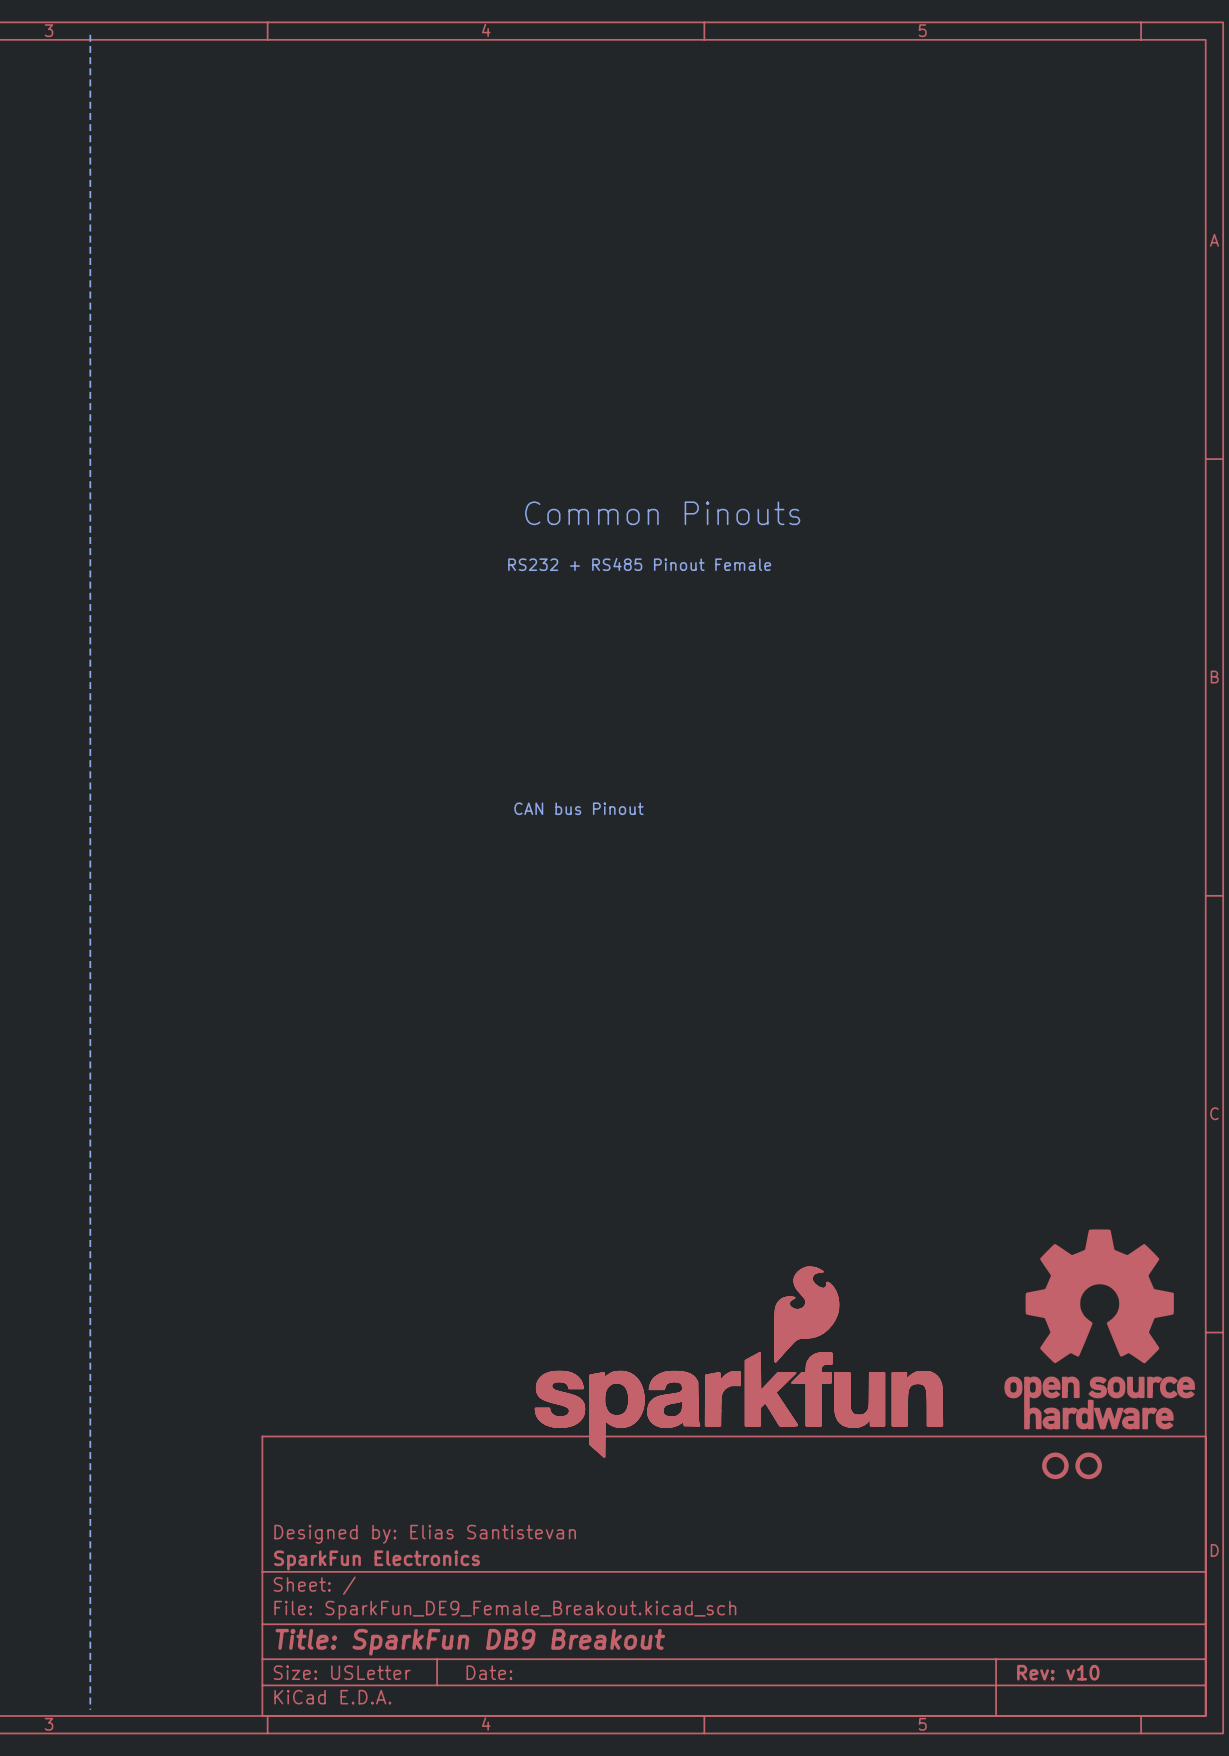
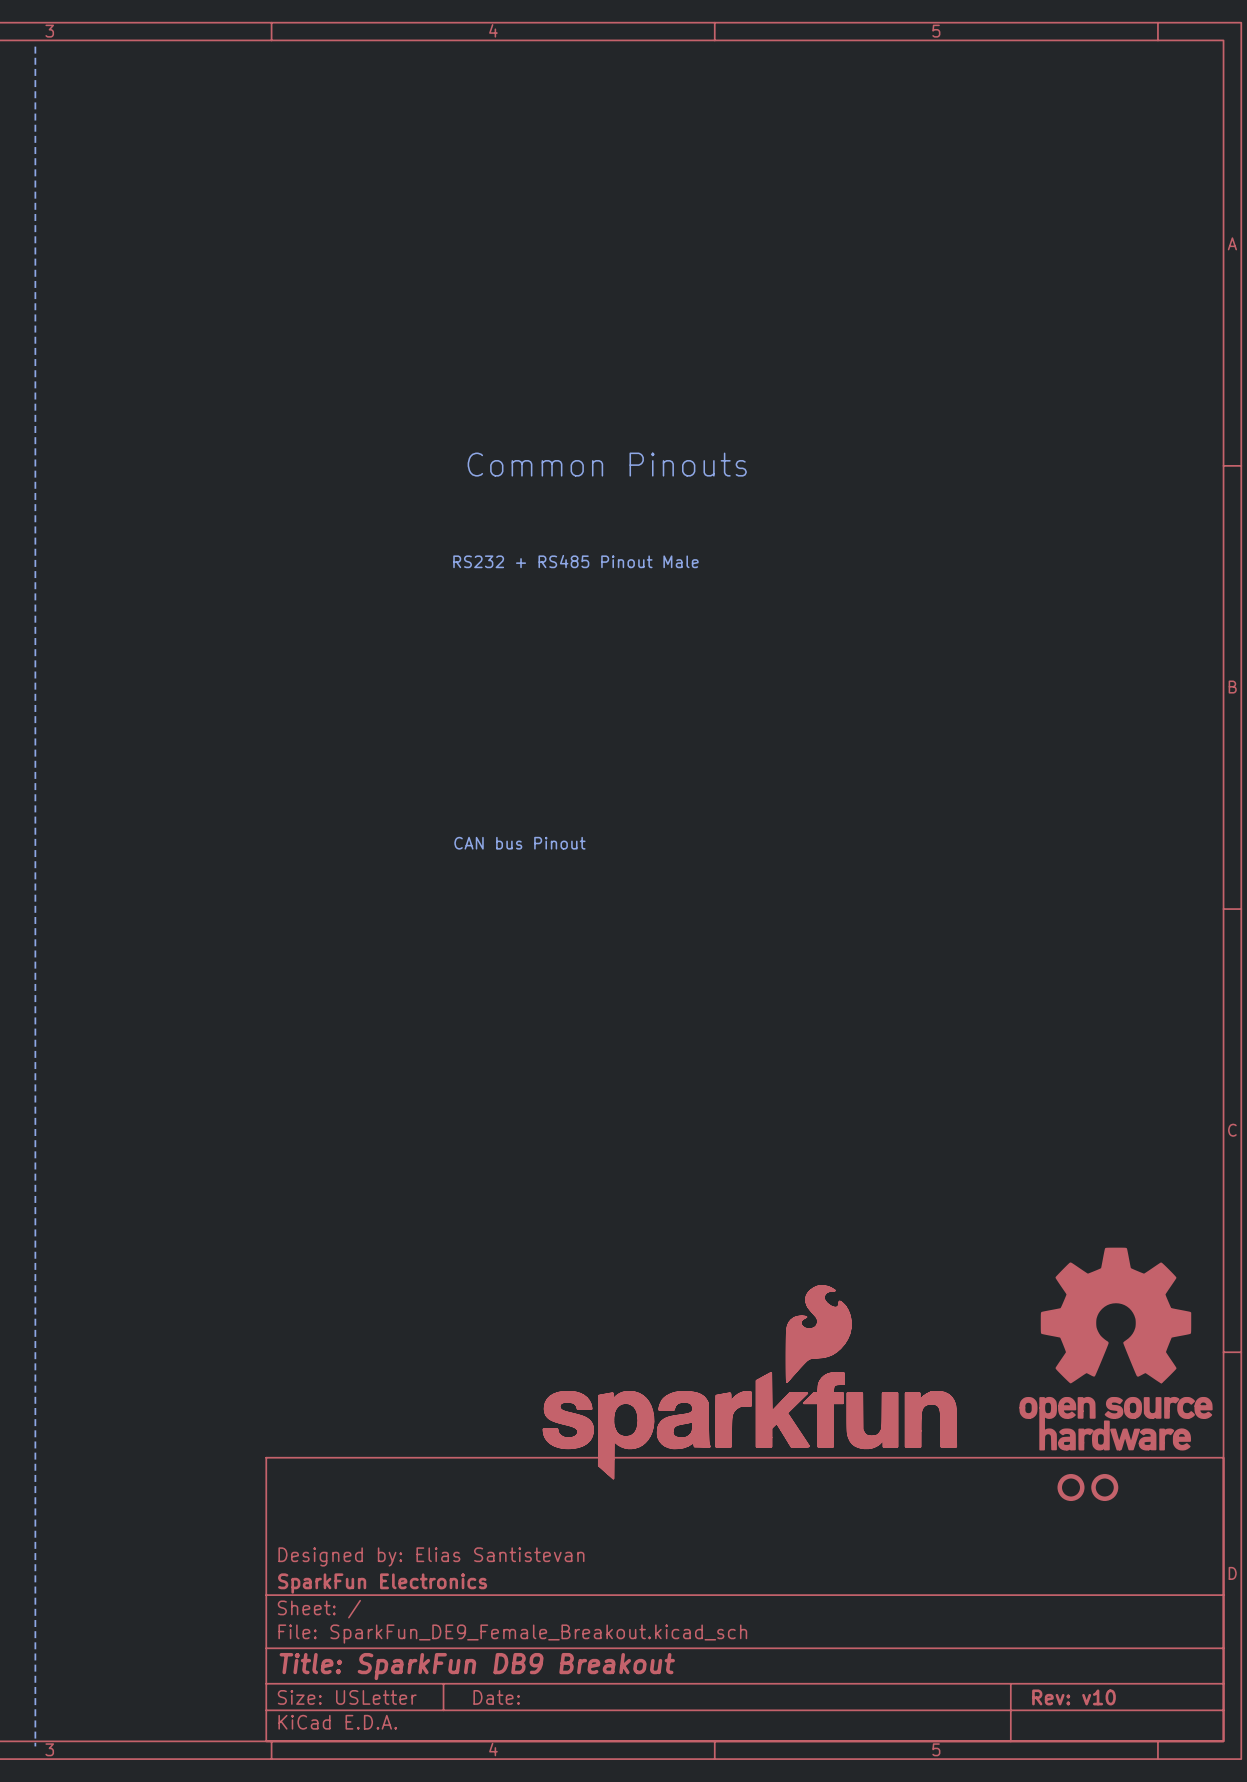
line: (90, 34) (90, 1709) -> (35, 46) (35, 1746)
text position: Common Pinouts (662, 513) -> Common Pinouts (607, 464)
text: RS232 + RS485 Pinout Female (639, 564) -> RS232 + RS485 Pinout Male (575, 561)
text position: CAN bus Pinout (578, 808) -> CAN bus Pinout (519, 843)

